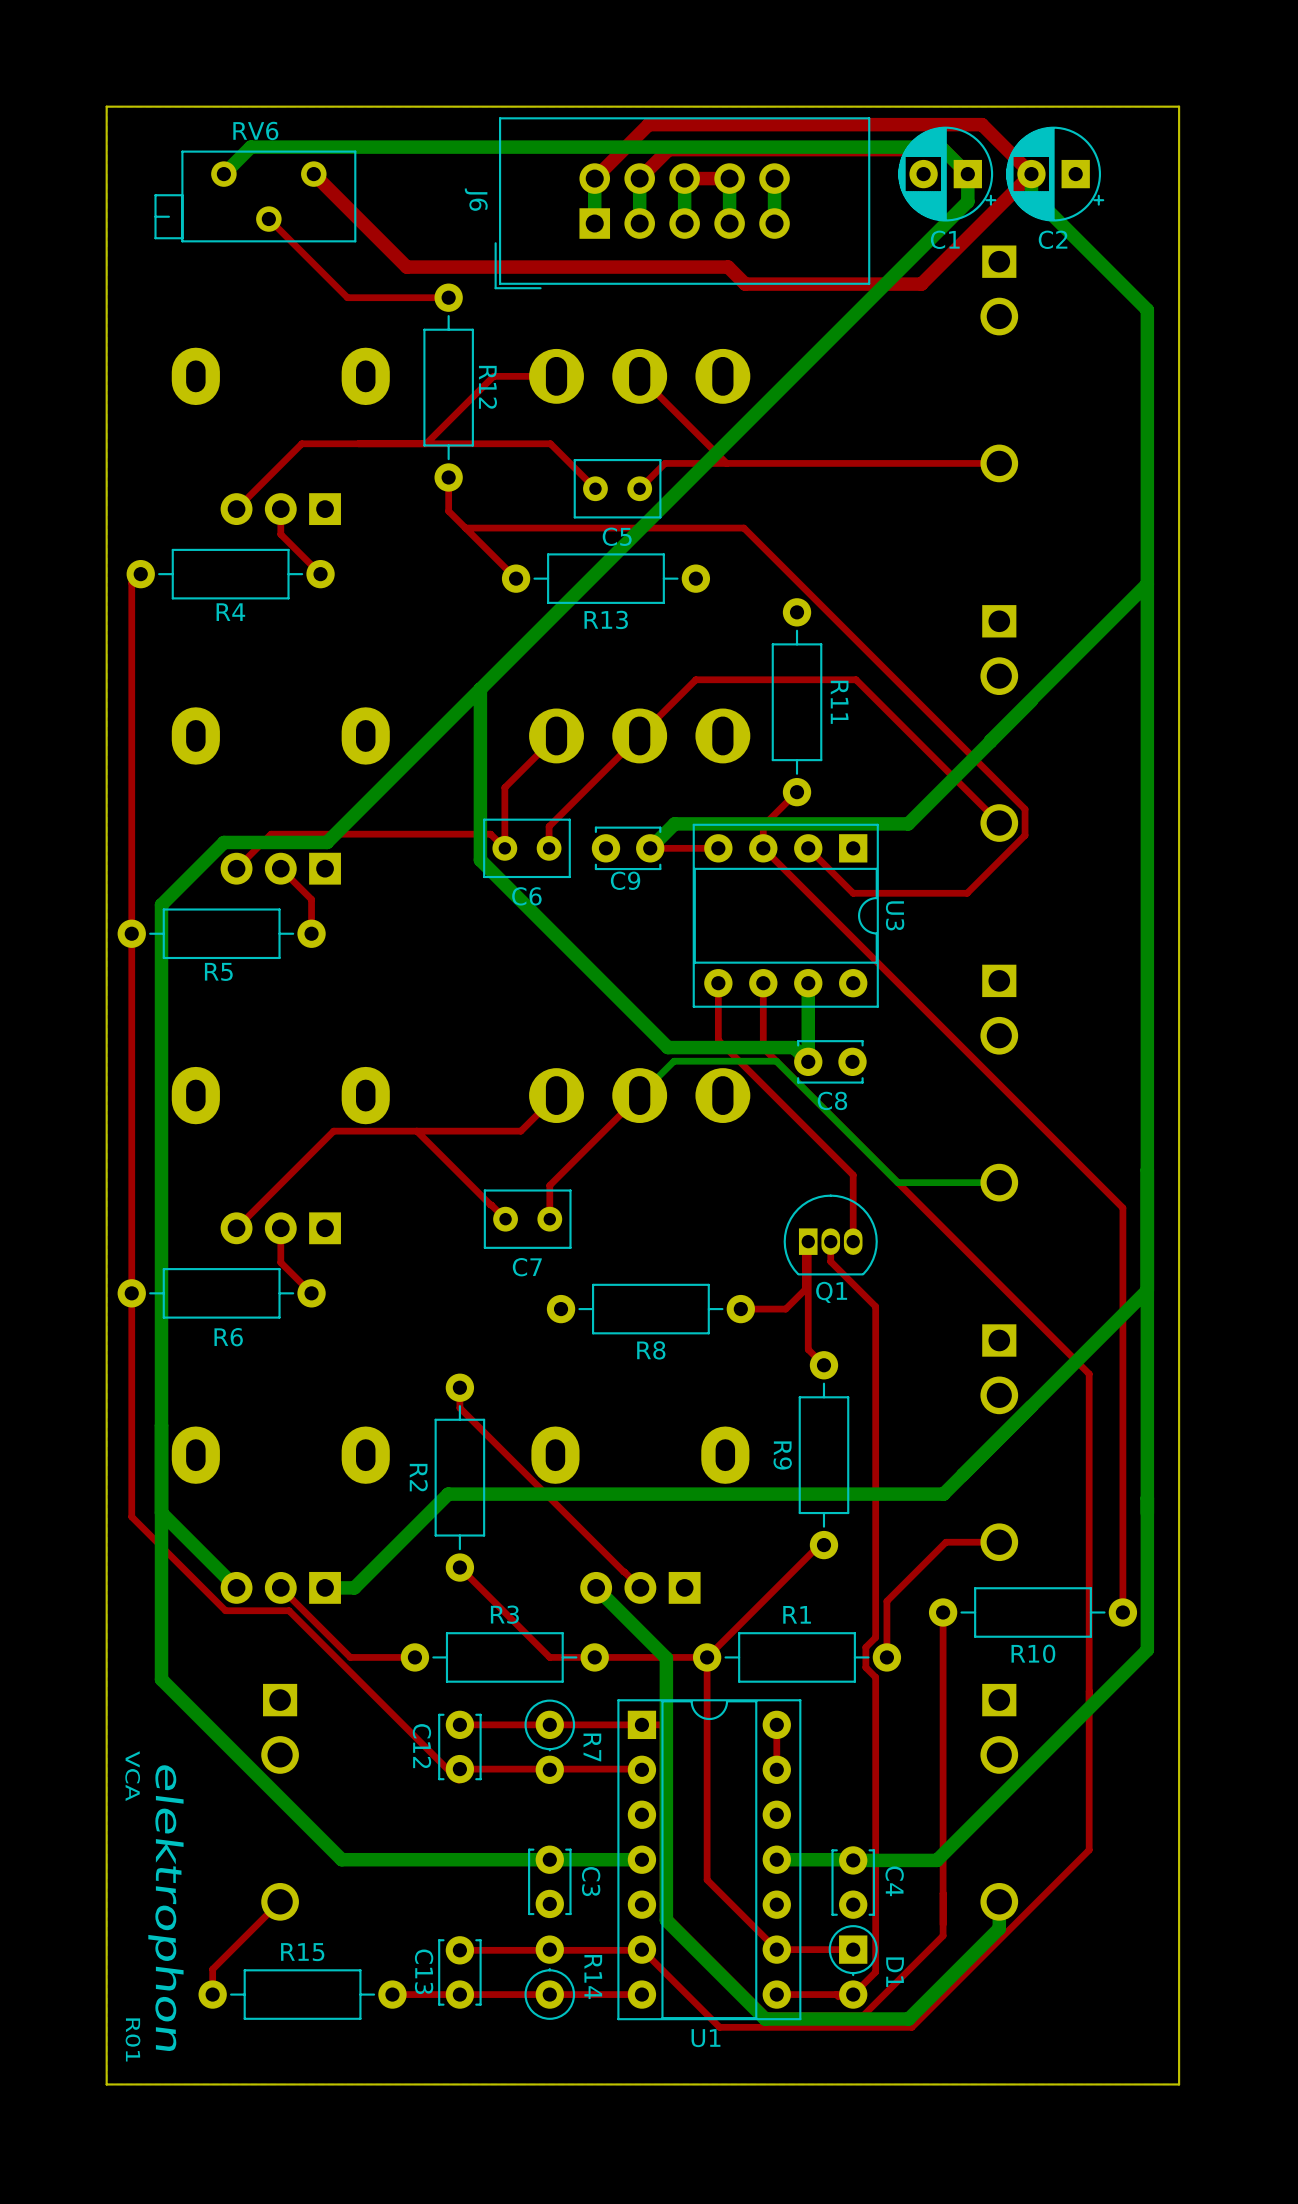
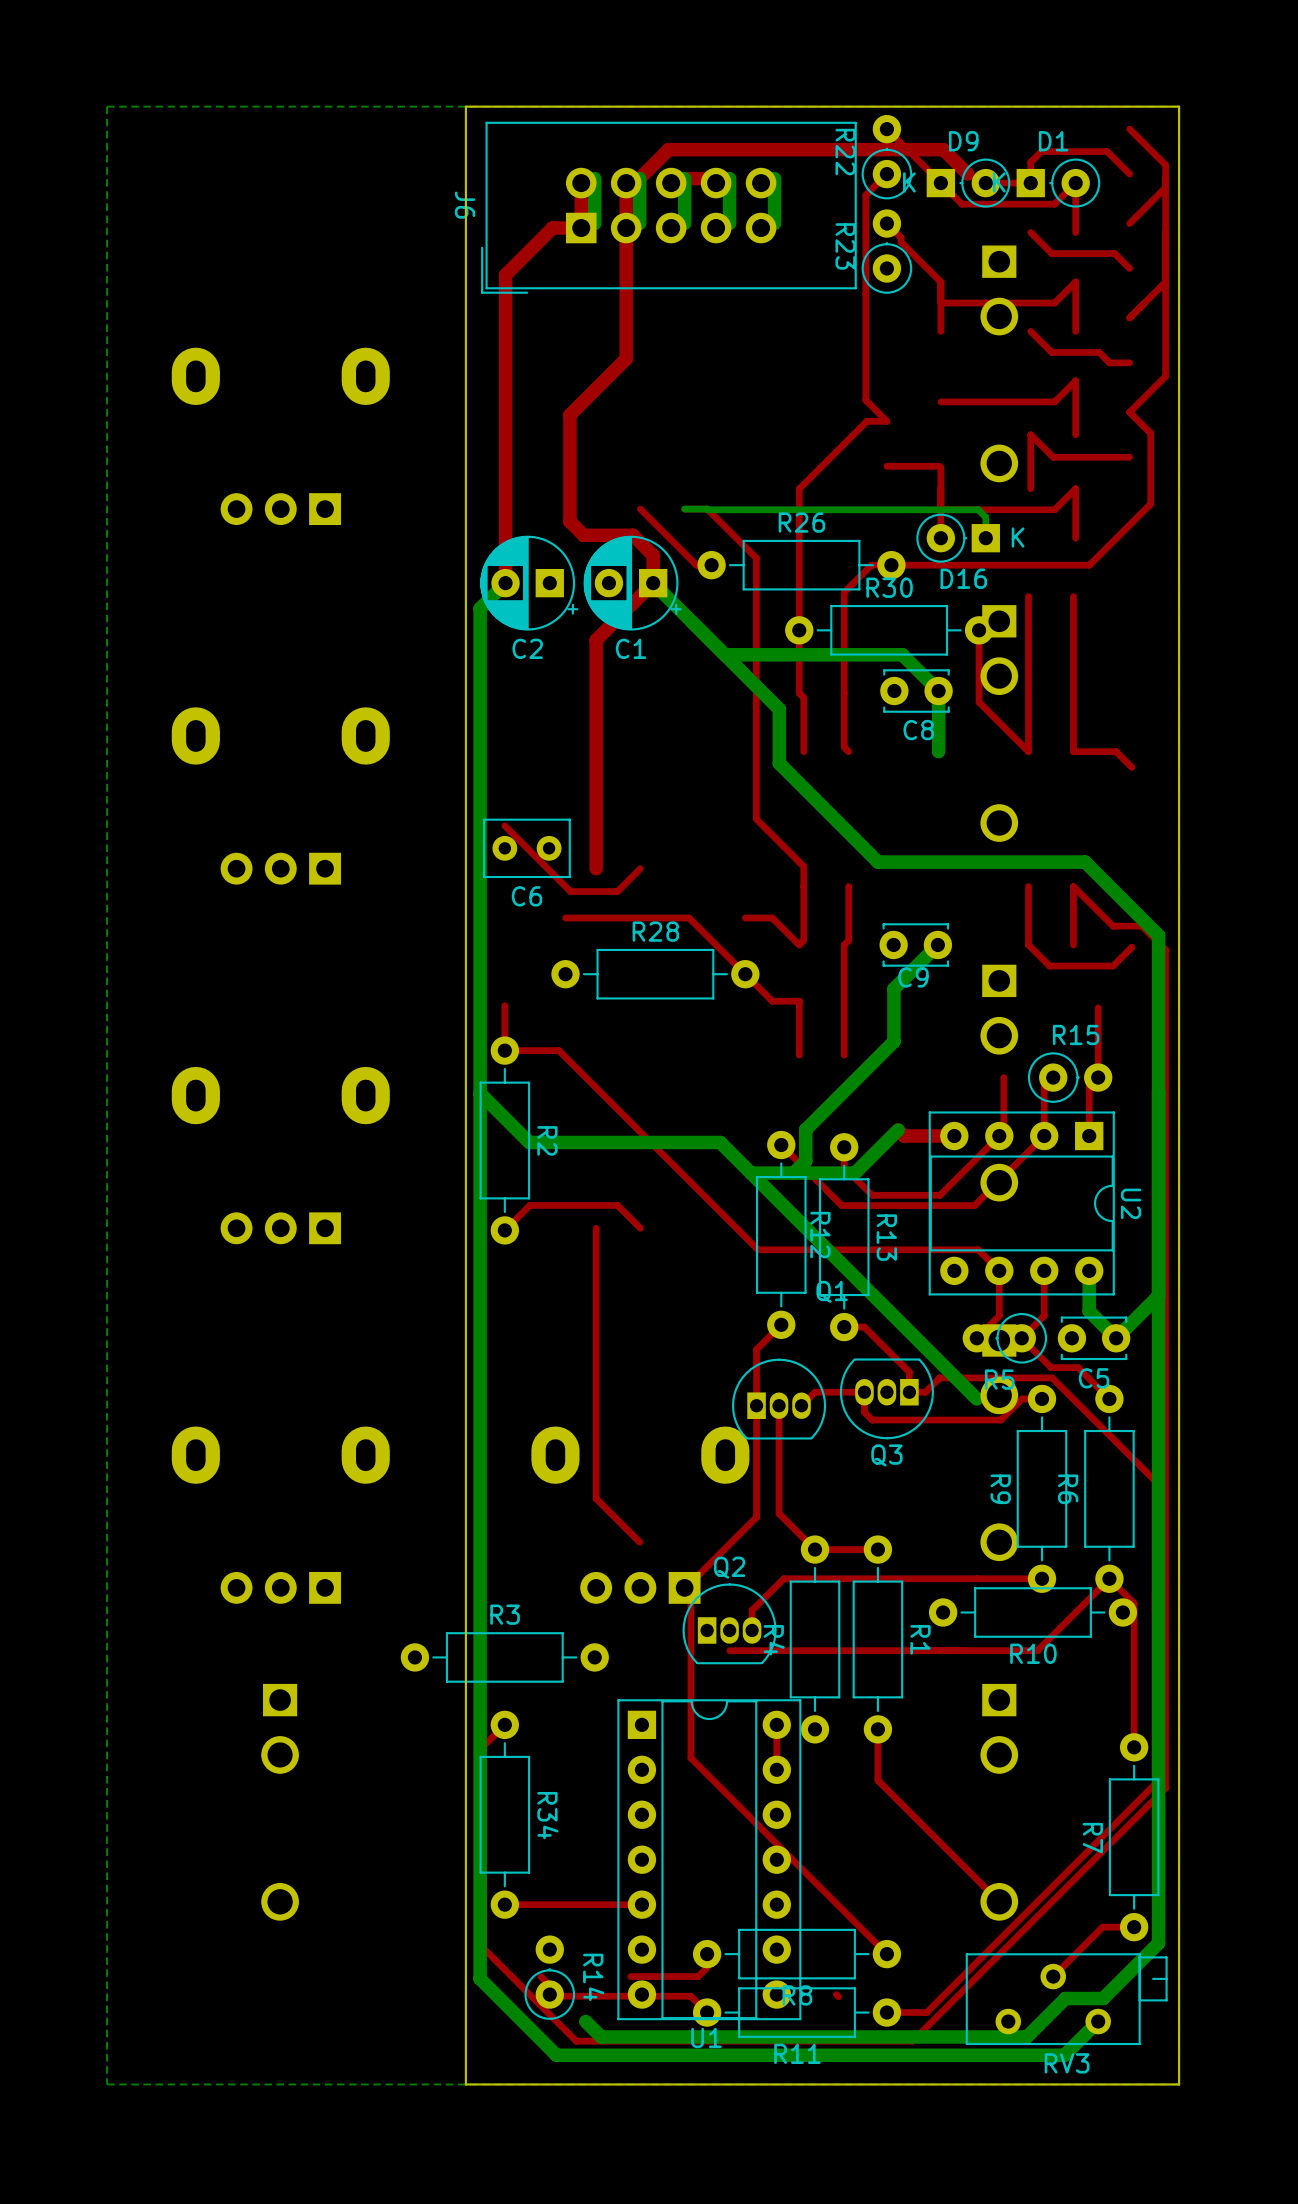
board edge: (465, 106) (106, 106) (106, 2084) (465, 2084) -> (465, 106) (465, 2084)
top track: none -> (886, 129) (961, 204) (1054, 204) (1075, 183) (1075, 232)
top track: none -> (1129, 129) (1165, 165) (1165, 376) (1129, 412) (1150, 433) (1150, 503) (1089, 565) (871, 565) (844, 592) (844, 747) (848, 751)
R22: none -> (886, 157)
bottom track: (223, 174) (250, 147) (940, 147) (967, 174) (967, 201) (327, 842) (223, 842) (161, 904) (161, 1679) (341, 1859) (641, 1859) -> none
top track: (313, 174) (406, 267) (728, 267) (745, 284) (921, 284) (1031, 174) (982, 124) (648, 124) (594, 178) -> none
top track: none -> (886, 174) (865, 195) (865, 400) (886, 421) (866, 421) (799, 488) (799, 693) (803, 697) (803, 751)
C1 position: (947, 174) -> (632, 583)
bottom track: (1031, 174) (1031, 194) (1147, 309) (1147, 1650) (936, 1860) (776, 1859) -> none
C2 position: (1055, 174) -> (529, 583)
top track: none -> (1129, 174) (1107, 151) (1041, 151) (1030, 162) (1030, 183) (985, 183)
top track: none -> (581, 183) (581, 228) (552, 228) (505, 274) (505, 583)
top track: none -> (626, 183) (626, 358) (569, 415) (569, 521) (583, 535) (632, 535) (653, 555) (653, 583) (596, 640) (596, 868)
D9: none -> (968, 183)
top track: none -> (1165, 187) (1129, 223)
RV6: (255, 196) -> none
J6 position: (682, 203) -> (668, 207)
top track: (268, 219) (347, 297) (448, 297) -> none
top track: none -> (886, 223) (901, 237) (901, 242) (940, 281) (940, 331)
top track: none -> (1030, 232) (1051, 253) (1114, 253) (1129, 268)
R23: none -> (886, 251)
top track: none -> (1165, 281) (1129, 317)
top track: none -> (941, 303) (1054, 303) (1075, 281) (1075, 331)
top track: none -> (1030, 331) (1051, 352) (1099, 352) (1109, 362) (1129, 362)
top track: (556, 376) (493, 376) (426, 443) -> none
top track: (639, 376) (726, 463) -> none
part: (639, 376) -> none
R12 position: (448, 387) -> (781, 1234)
top track: none -> (941, 401) (1054, 401) (1075, 380) (1075, 434)
top track: none -> (1129, 457) (1053, 457) (1030, 434) (1030, 488)
C5 footprint: [573, 459, 662, 519] -> [1057, 1316, 1131, 1361]
top track: (999, 463) (665, 463) (639, 488) -> none
top track: none -> (886, 466) (939, 466) (940, 467) (940, 538)
top track: (448, 477) (448, 511) (516, 578) -> none
top track: (595, 488) (550, 443) (301, 443) (236, 509) -> none
top track: (280, 509) (280, 534) (320, 574) -> none
top track: none -> (640, 509) (696, 565) (711, 565)
bottom track: none -> (684, 509) (978, 509) (985, 517) (985, 538)
top track: none -> (684, 509) (707, 509) (756, 558) (756, 819) (803, 866) (803, 940) (799, 944) (772, 918) (745, 918)
top track: none -> (941, 509) (1054, 509) (1075, 488) (1075, 538)
top track: (465, 528) (743, 528) (1025, 809) (1025, 835) (967, 893) (853, 893) (808, 848) -> none
D16: none -> (958, 538)
R26: none -> (801, 565)
top track: (140, 574) (131, 583) (131, 1516) (225, 1610) (289, 1610) (458, 1780) -> none
R4 rotation: 0° (230, 574) -> 90° clockwise (815, 1639)
R4 position: (230, 574) -> (815, 1639)
R13 rotation: 0° (605, 578) -> 90° clockwise (844, 1237)
R13 position: (605, 578) -> (844, 1237)
bottom track: none -> (505, 583) (480, 608) (480, 1978) (556, 2055) (1064, 2055) (1098, 2021)
bottom track: none -> (653, 583) (779, 709) (779, 763) (878, 862) (1085, 862) (1158, 935) (1158, 1943) (1103, 1998) (1065, 1998) (1026, 2036) (601, 2036) (585, 2021)
bottom track: (1147, 583) (990, 741) -> none
top track: none -> (1028, 596) (1028, 751) (979, 702) (979, 630)
top track: none -> (1073, 596) (1073, 751) (1116, 751) (1131, 767)
R13 name position: R13 (606, 619) -> R13 (886, 1237)
R30: none -> (889, 630)
bottom track: none -> (724, 654) (902, 654) (938, 691) (938, 751)
bottom track: (480, 689) (480, 860) (667, 1047) (793, 1047) (808, 1061) (808, 983) -> none
bottom track: (1031, 700) (908, 823) (674, 823) (650, 848) -> none
R11 rotation: 0° (797, 702) -> 90° clockwise (797, 2012)
R11 position: (797, 702) -> (797, 2012)
top track: (556, 735) (504, 787) (504, 848) (490, 834) (271, 834) (236, 868) -> none
part: (639, 735) -> none
top track: (797, 792) (763, 825) (763, 848) (1122, 1207) (1122, 1612) -> none
top track: (999, 823) (856, 679) (695, 679) (549, 826) (549, 848) -> none
top track: none -> (504, 825) (570, 891) (617, 891) (640, 868)
C9 position: (628, 848) -> (915, 944)
top track: (718, 848) (650, 848) -> none
top track: (280, 868) (311, 899) (311, 933) -> none
top track: none -> (848, 886) (848, 940) (844, 944) (844, 1055)
top track: none -> (1028, 886) (1028, 944) (1049, 966) (1113, 966) (1131, 947)
R5 footprint: [117, 908, 326, 960] -> [962, 1312, 1048, 1364]
U3: (785, 915) -> none
top track: none -> (565, 918) (689, 918) (772, 1001) (799, 1001) (799, 1055)
bottom track: none -> (937, 944) (893, 988) (893, 1041) (805, 1129) (805, 1161) (793, 1173)
top track: none -> (1073, 944) (1073, 886) (1113, 926) (1142, 926) (1165, 949) (1165, 1788) (912, 2041) (576, 2041) (483, 1948) (483, 1745) (504, 1724)
R28: none -> (655, 974)
top track: (718, 983) (718, 1040) (853, 1175) (853, 1241) -> none
top track: (763, 983) (763, 1048) (1089, 1373) (1089, 1850) -> (844, 1327) (864, 1327) (909, 1372) (909, 1392) (925, 1392) (939, 1377) (1052, 1377) (1155, 1481) (1155, 1784) (1089, 1850)
top track: none -> (504, 1005) (504, 1050) (558, 1050) (758, 1249) (978, 1249) (999, 1270) (999, 1315) (976, 1338)
top track: none -> (1098, 1007) (1098, 1077) (1089, 1086) (1089, 1136)
C8 position: (830, 1061) -> (916, 691)
top track: none -> (1003, 1077) (1003, 1131) (940, 1195) (872, 1195) (844, 1167) (844, 1147)
top track: none -> (1053, 1077) (1044, 1086) (1044, 1136) (974, 1205) (841, 1205) (781, 1145)
bottom track: none -> (480, 1093) (529, 1142) (720, 1142) (976, 1398)
top track: (556, 1095) (520, 1131) (333, 1131) (236, 1228) -> none
bottom track: (639, 1095) (674, 1061) (776, 1061) (897, 1182) (999, 1182) -> none
top track: (639, 1095) (549, 1185) (549, 1219) -> none
part: (639, 1095) -> none
bottom track: none -> (898, 1129) (855, 1173) (750, 1173)
top track: none -> (898, 1129) (904, 1136) (954, 1136)
top track: (416, 1131) (505, 1219) -> none
U2: none -> (1021, 1203)
C7: (527, 1219) -> none
top track: (280, 1228) (280, 1262) (311, 1293) -> none
top track: none -> (596, 1228) (596, 1498) (639, 1542)
top track: none -> (640, 1228) (617, 1205) (529, 1205) (504, 1230)
Q1 position: (830, 1235) -> (779, 1399)
top track: (830, 1241) (830, 1261) (875, 1306) (875, 1637) (865, 1647) (865, 1667) (875, 1677) (875, 1972) (853, 1994) -> none
top track: none -> (1044, 1270) (1044, 1315) (1021, 1338) (1051, 1367) (1078, 1367) (1109, 1398)
bottom track: none -> (1089, 1270) (1089, 1311) (1116, 1338) (1158, 1295)
bottom track: (1147, 1290) (943, 1494) (448, 1494) (354, 1587) (325, 1587) -> none
R6 rotation: 0° (221, 1293) -> 90° clockwise (1109, 1488)
R6 position: (221, 1293) -> (1109, 1488)
R8 position: (650, 1309) -> (797, 1954)
top track: (740, 1309) (785, 1309) (805, 1289) (805, 1244) (808, 1241) (808, 1349) (823, 1365) -> none
top track: none -> (781, 1324) (756, 1349) (756, 1517) (690, 1582) (690, 1758) (886, 1954)
top track: (459, 1387) (459, 1408) (640, 1587) -> none
Q3: none -> (886, 1398)
top track: none -> (1041, 1398) (1021, 1398) (1000, 1420) (872, 1420) (864, 1412) (864, 1392) (815, 1392) (801, 1405)
top track: none -> (779, 1405) (779, 1513) (815, 1549) (877, 1549)
R9 position: (823, 1455) -> (1041, 1488)
R2 name position: R2 (418, 1477) -> R2 (547, 1140)
R2 position: (459, 1477) -> (504, 1140)
bottom track: (161, 1512) (236, 1587) -> none
top track: (999, 1542) (945, 1542) (886, 1601) (886, 1657) -> none
top track: (823, 1545) (819, 1545) (707, 1657) -> none
top track: (459, 1567) (549, 1657) (707, 1657) -> none
top track: none -> (1041, 1578) (783, 1578) (752, 1610) (752, 1630)
top track: (280, 1587) (350, 1657) (414, 1657) -> none
bottom track: (596, 1587) (666, 1658) (666, 1920) (765, 2019) (908, 2019) (999, 1928) (999, 1901) -> none
top track: (943, 1612) (943, 1935) (863, 2015) (766, 2015) (663, 1911) (663, 1725) -> none
Q2: none -> (729, 1623)
top track: none -> (729, 1650) (1037, 1650) (1109, 1578) (1134, 1603) (1134, 1747)
top track: (707, 1657) (707, 1879) (776, 1949) (841, 1949) -> none
R1 rotation: 0° (797, 1657) -> 90° clockwise (877, 1639)
R7 footprint: [524, 1699, 576, 1784] -> [1108, 1733, 1160, 1942]
top track: (662, 1724) (459, 1724) -> none
top track: none -> (877, 1729) (877, 1780) (999, 1901)
C12: (459, 1746) -> none
R7 name position: R7 (592, 1747) -> R7 (1092, 1838)
drawing: [125, 1751, 184, 2062] -> none
top track: (459, 1769) (641, 1769) -> none
R34: none -> (504, 1814)
C3: (549, 1881) -> none
C4: (853, 1882) -> none
top track: (280, 1901) (212, 1969) (212, 1994) -> none
top track: none -> (639, 1901) (636, 1904) (504, 1904)
D1 footprint: [828, 1925, 878, 2009] -> [1016, 158, 1101, 208]
top track: none -> (1134, 1927) (1102, 1927) (1053, 1976)
top track: (459, 1950) (641, 1949) (719, 2027) (911, 2027) (926, 2012) -> (886, 2012) (926, 2012)
top track: none -> (707, 1967) (698, 1976) (630, 1976)
R15 footprint: [198, 1969, 407, 2020] -> [1027, 1052, 1113, 1103]
C13: (459, 1972) -> none
D1 name position: D1 (895, 1972) -> D1 (1053, 141)
top track: none -> (540, 1976) (560, 1996) (690, 1996) (707, 2012)
top track: (641, 1994) (392, 1994) -> none
top track: (841, 1994) (776, 1994) -> none
RV3: none -> (1066, 1999)

